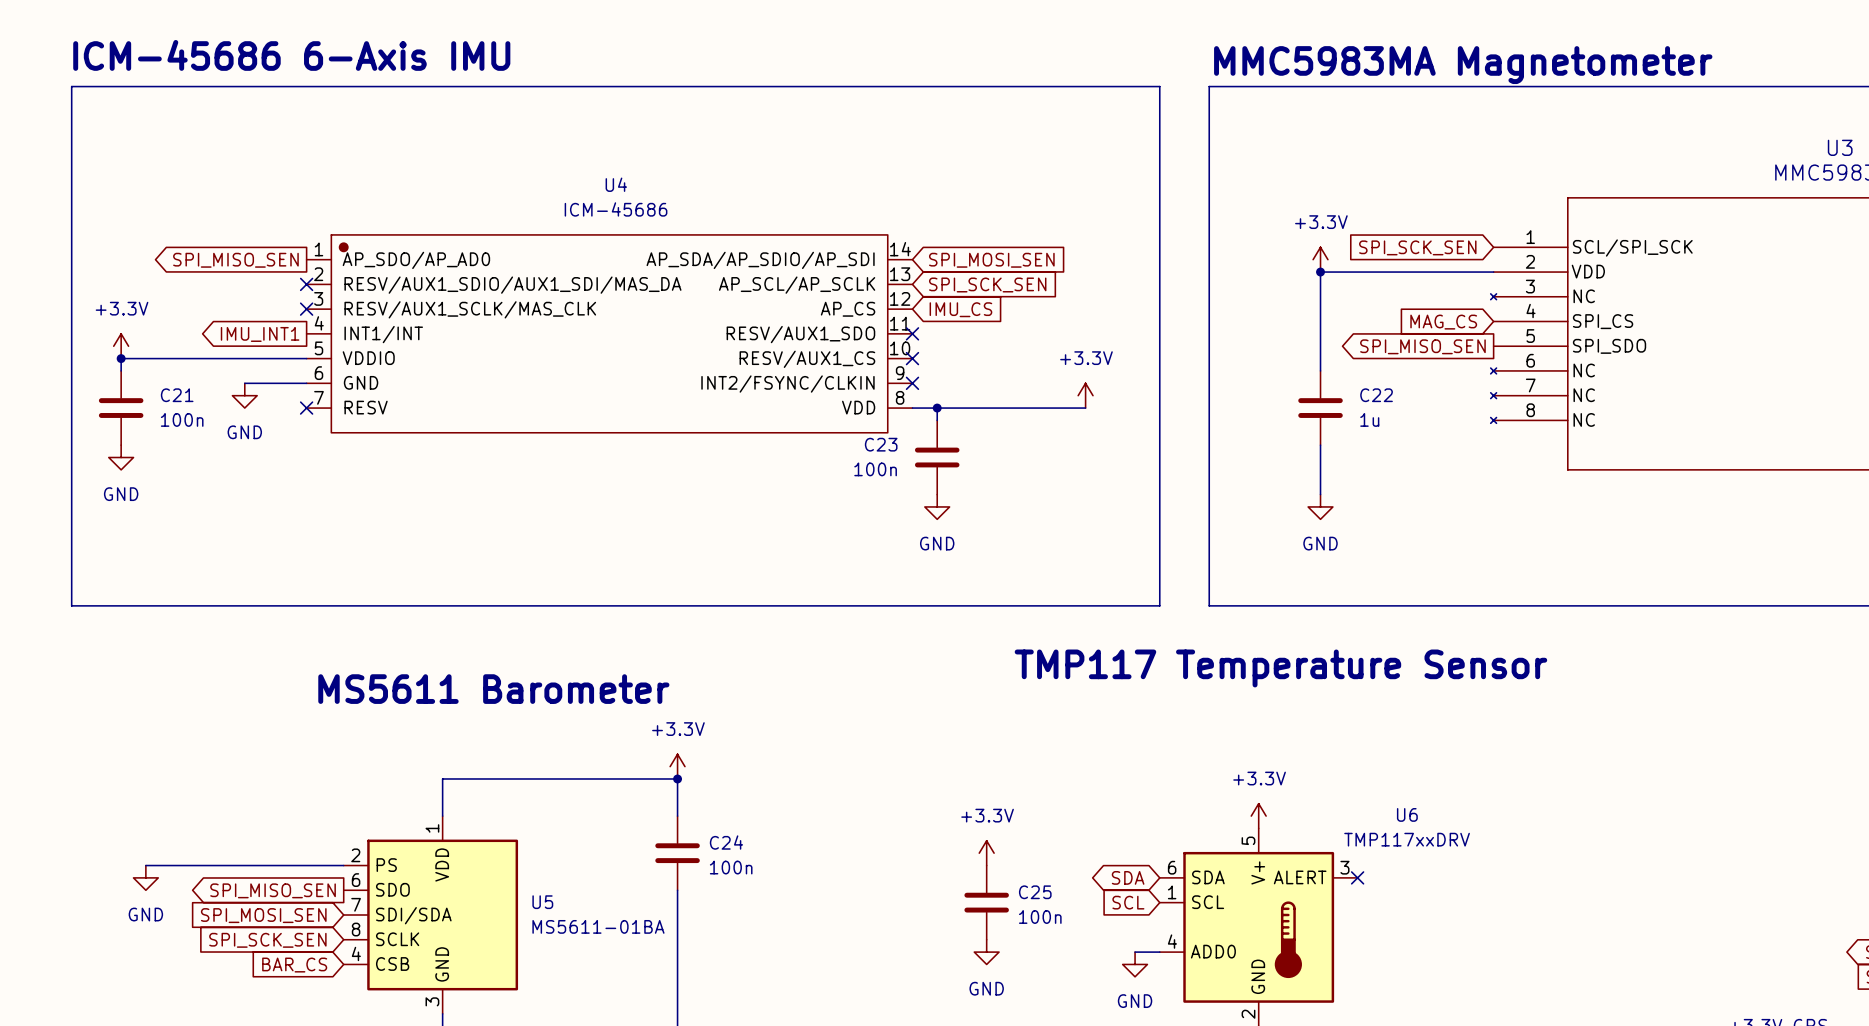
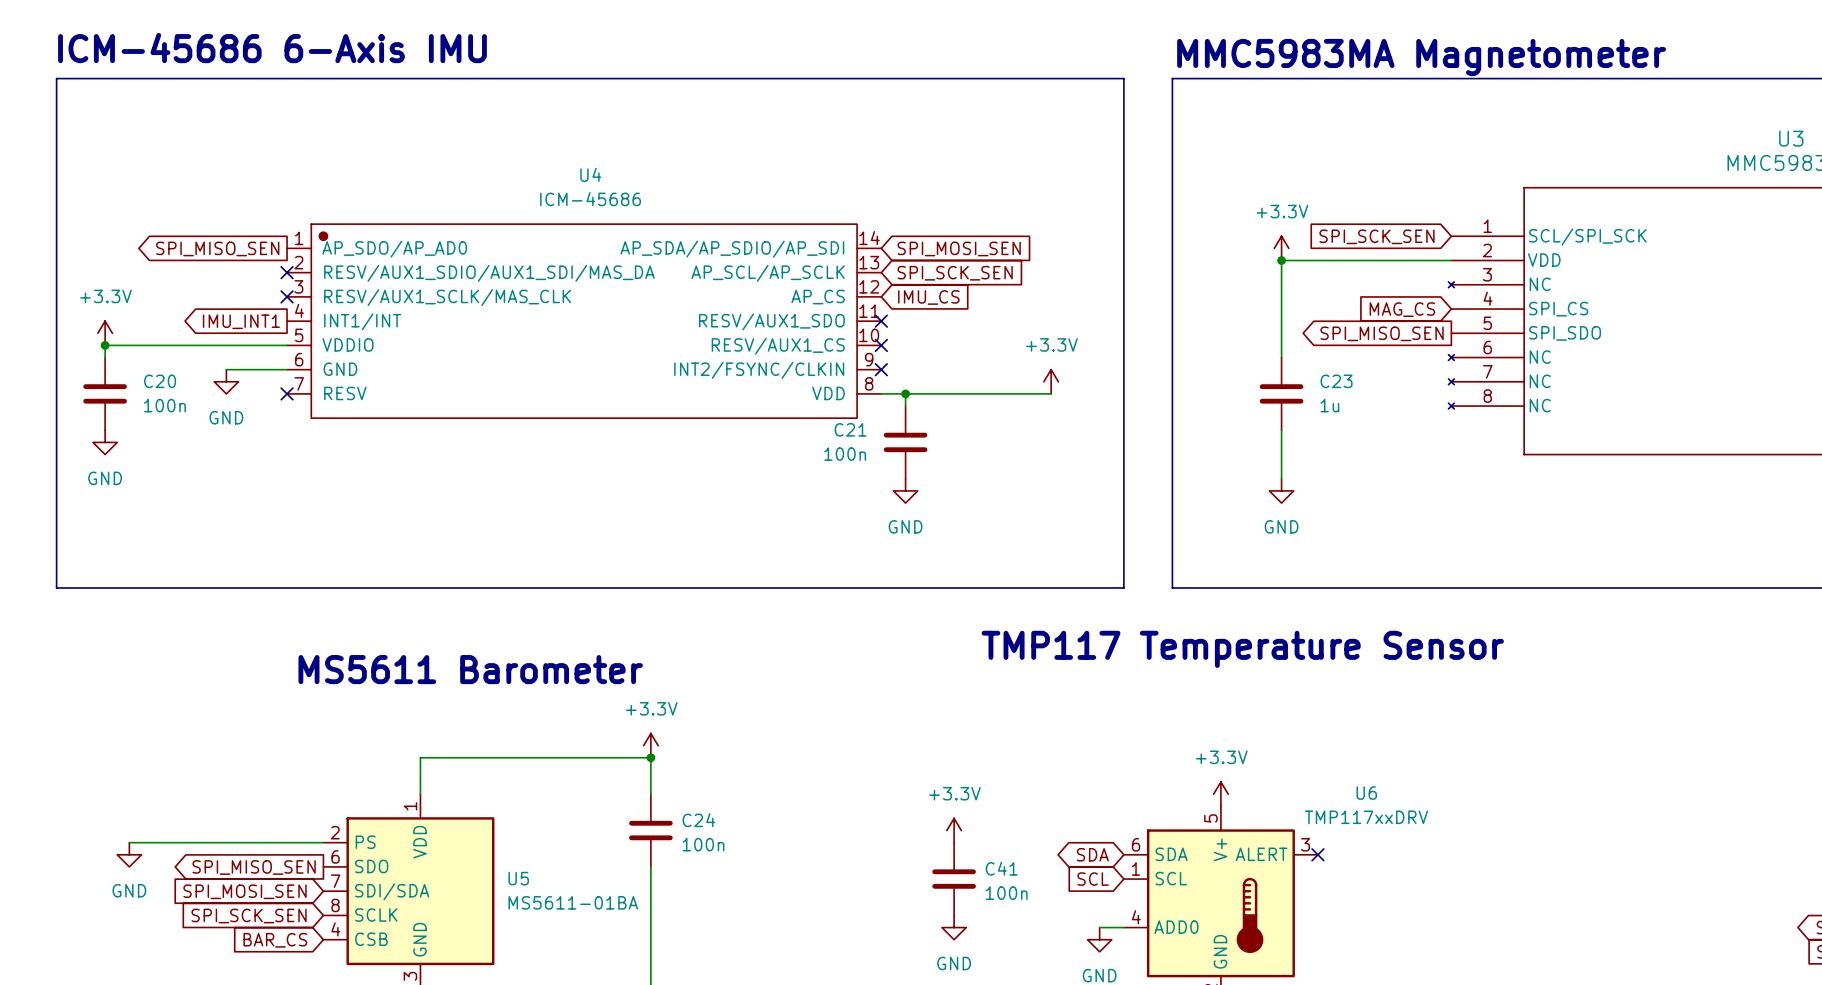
C21 name: C21 (177, 395) -> C20 (160, 381)
C22 name: C22 (1376, 395) -> C23 (1336, 381)
C23 name: C23 (881, 444) -> C21 (850, 429)
C25 name: C25 (1035, 892) -> C41 (1001, 868)

